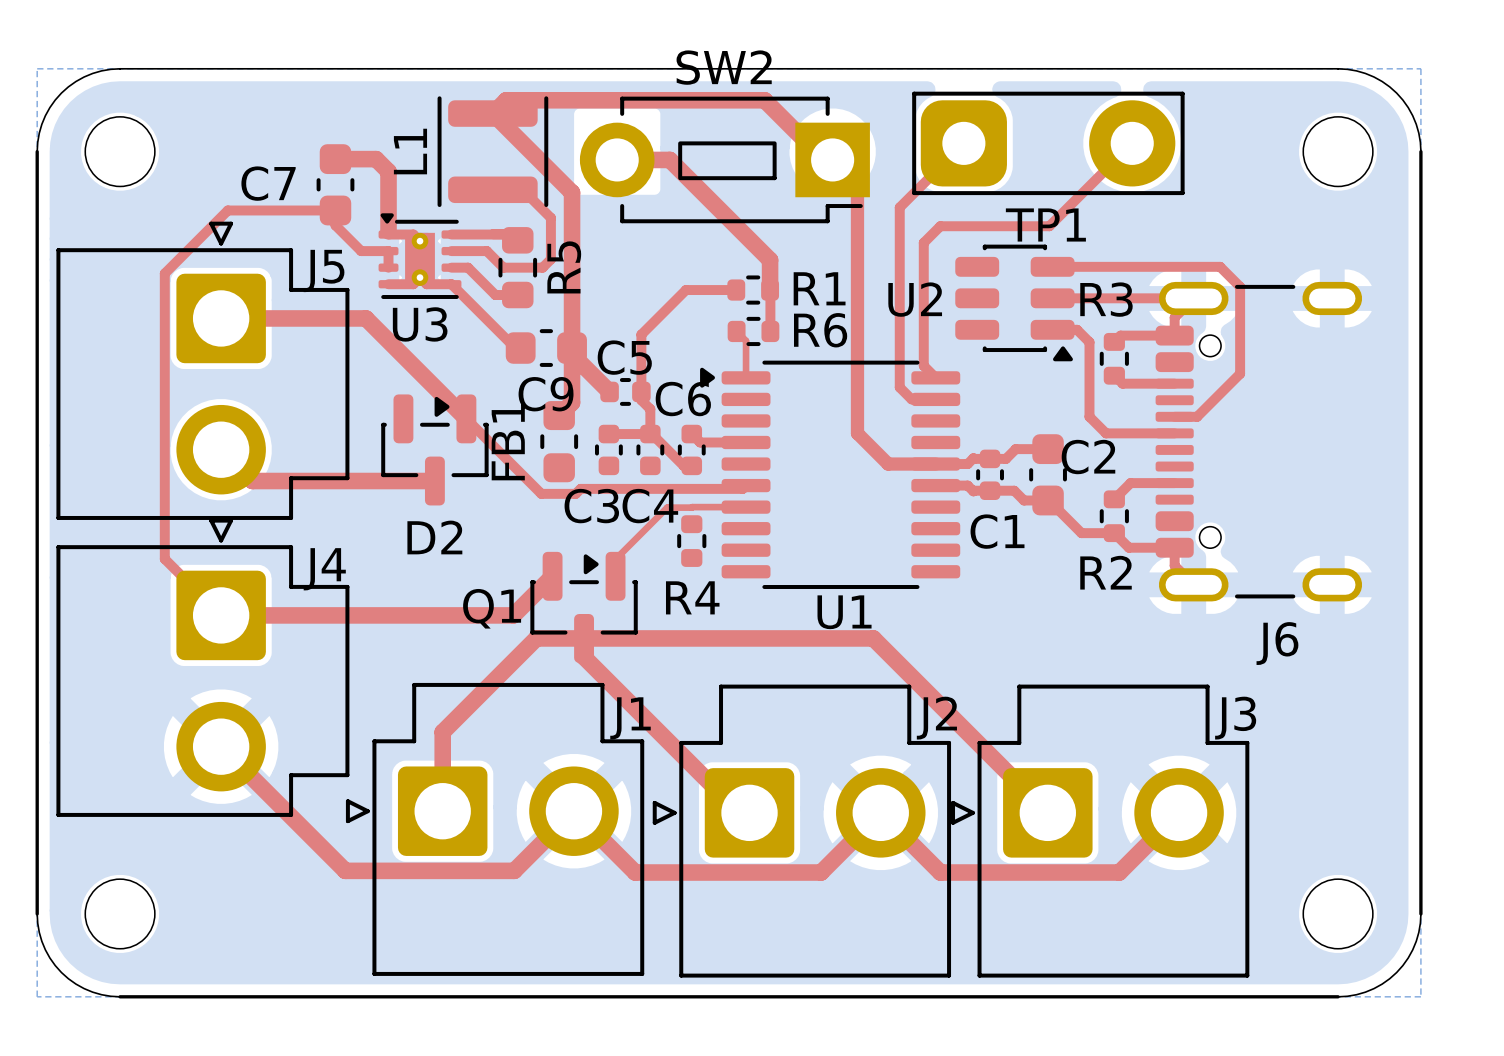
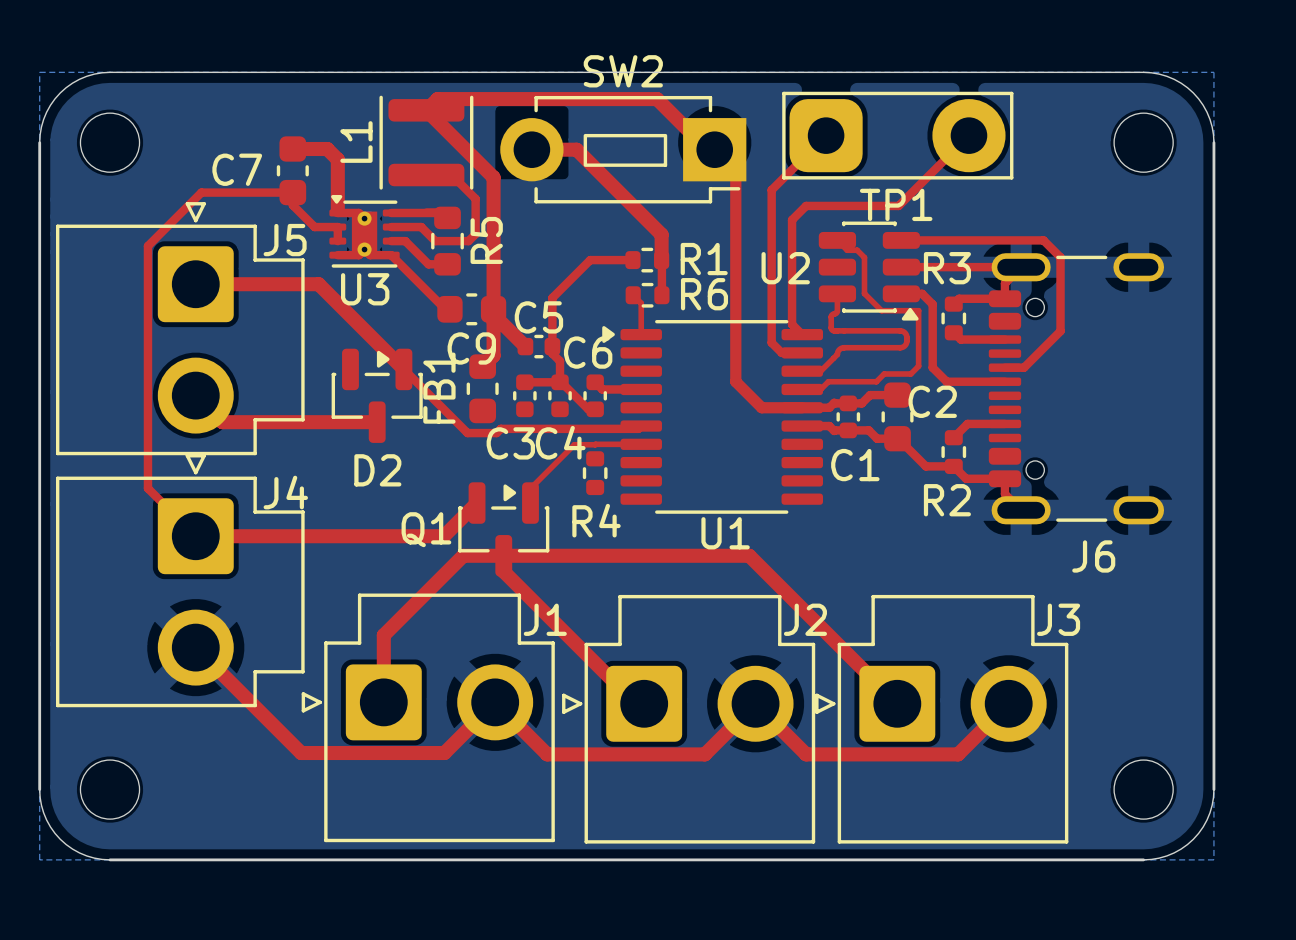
top track: none -> (837, 240) (847, 250) (857, 250) (864, 257) (864, 293) (881, 310) (918, 310) (918, 366) (910, 374) (884, 374) (876, 381) (828, 381) (820, 389) (802, 389)
top track: none -> (837, 293) (837, 311) (831, 316) (832, 330) (901, 331) (906, 335) (906, 343) (900, 347) (842, 347) (820, 371) (802, 371)

